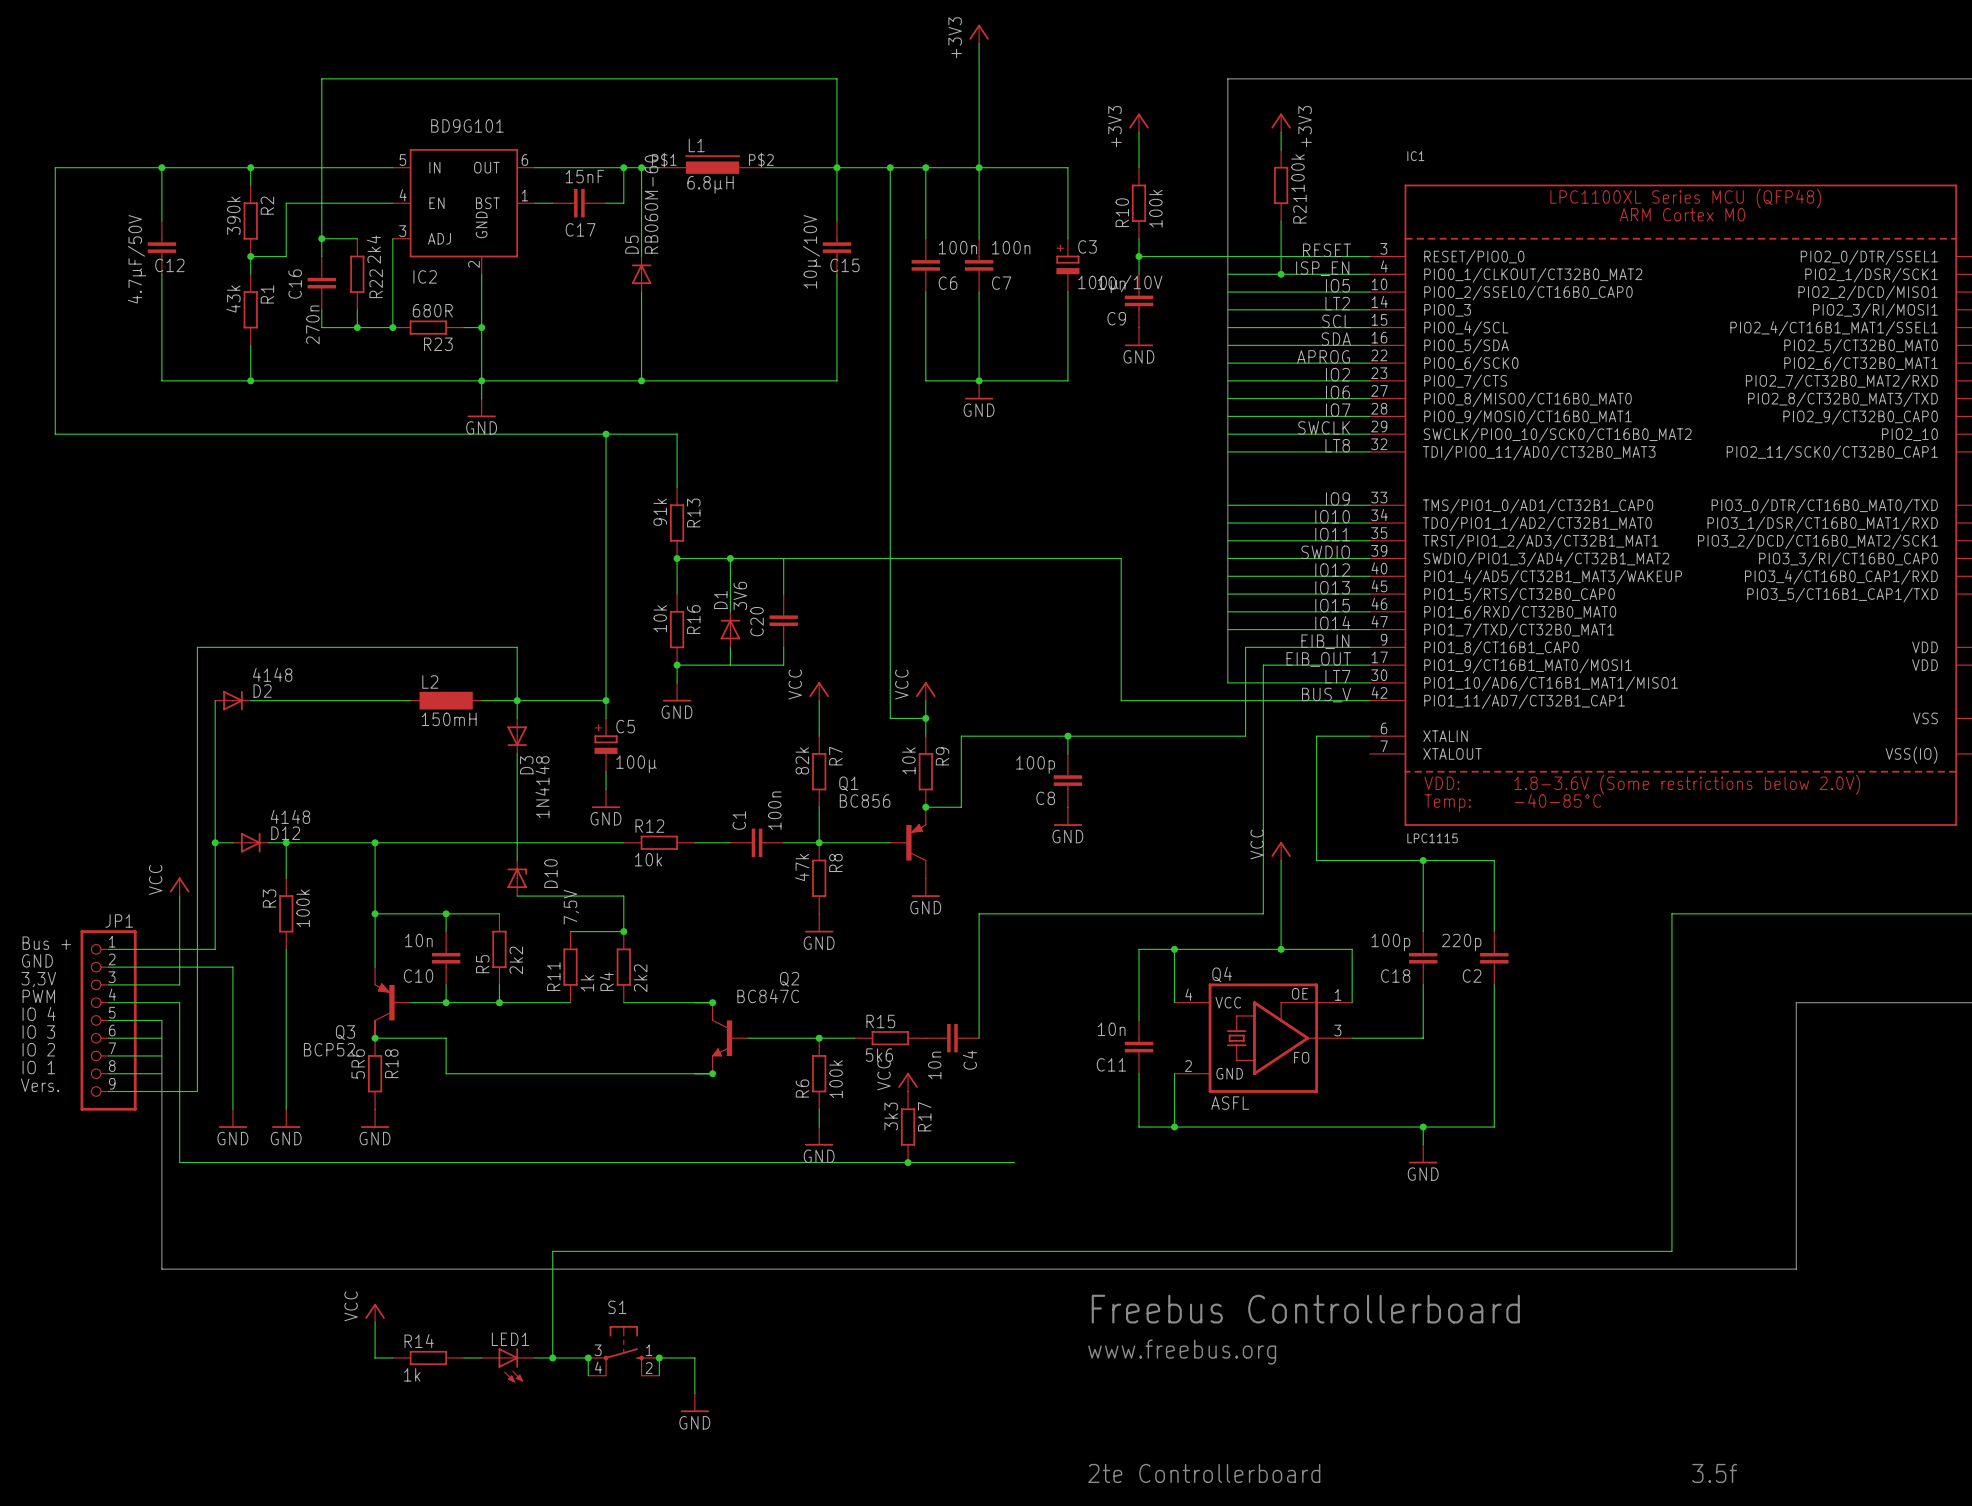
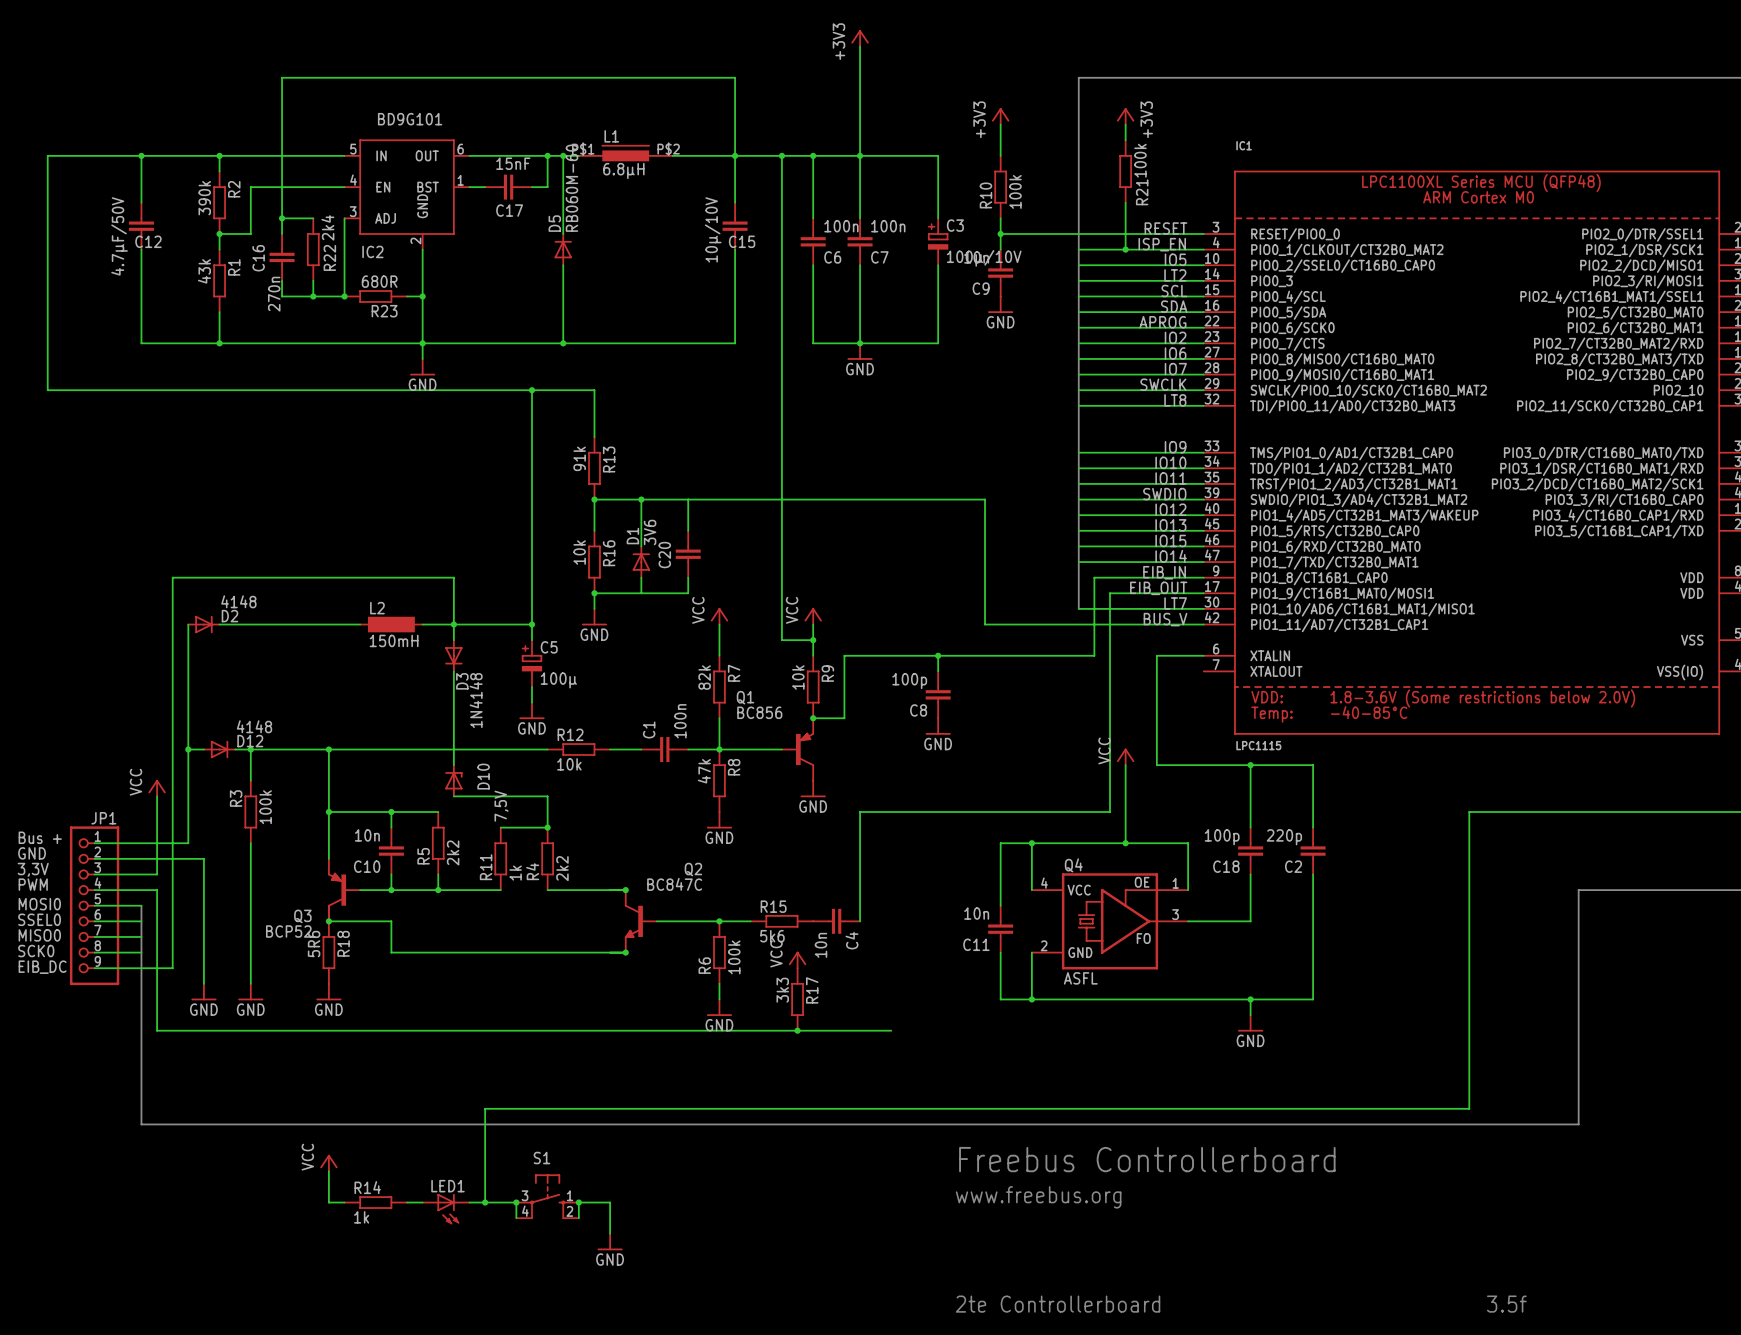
text: IO 4 (39, 1013) -> MOSI0 (39, 904)
text: IO 3 (38, 1031) -> SSEL0 (39, 919)
text: IO 2 (38, 1049) -> MISO0 (39, 935)
text: IO 1 (38, 1067) -> SCK0 (36, 951)
text: Vers. (40, 1085) -> EIB_DC (42, 967)

